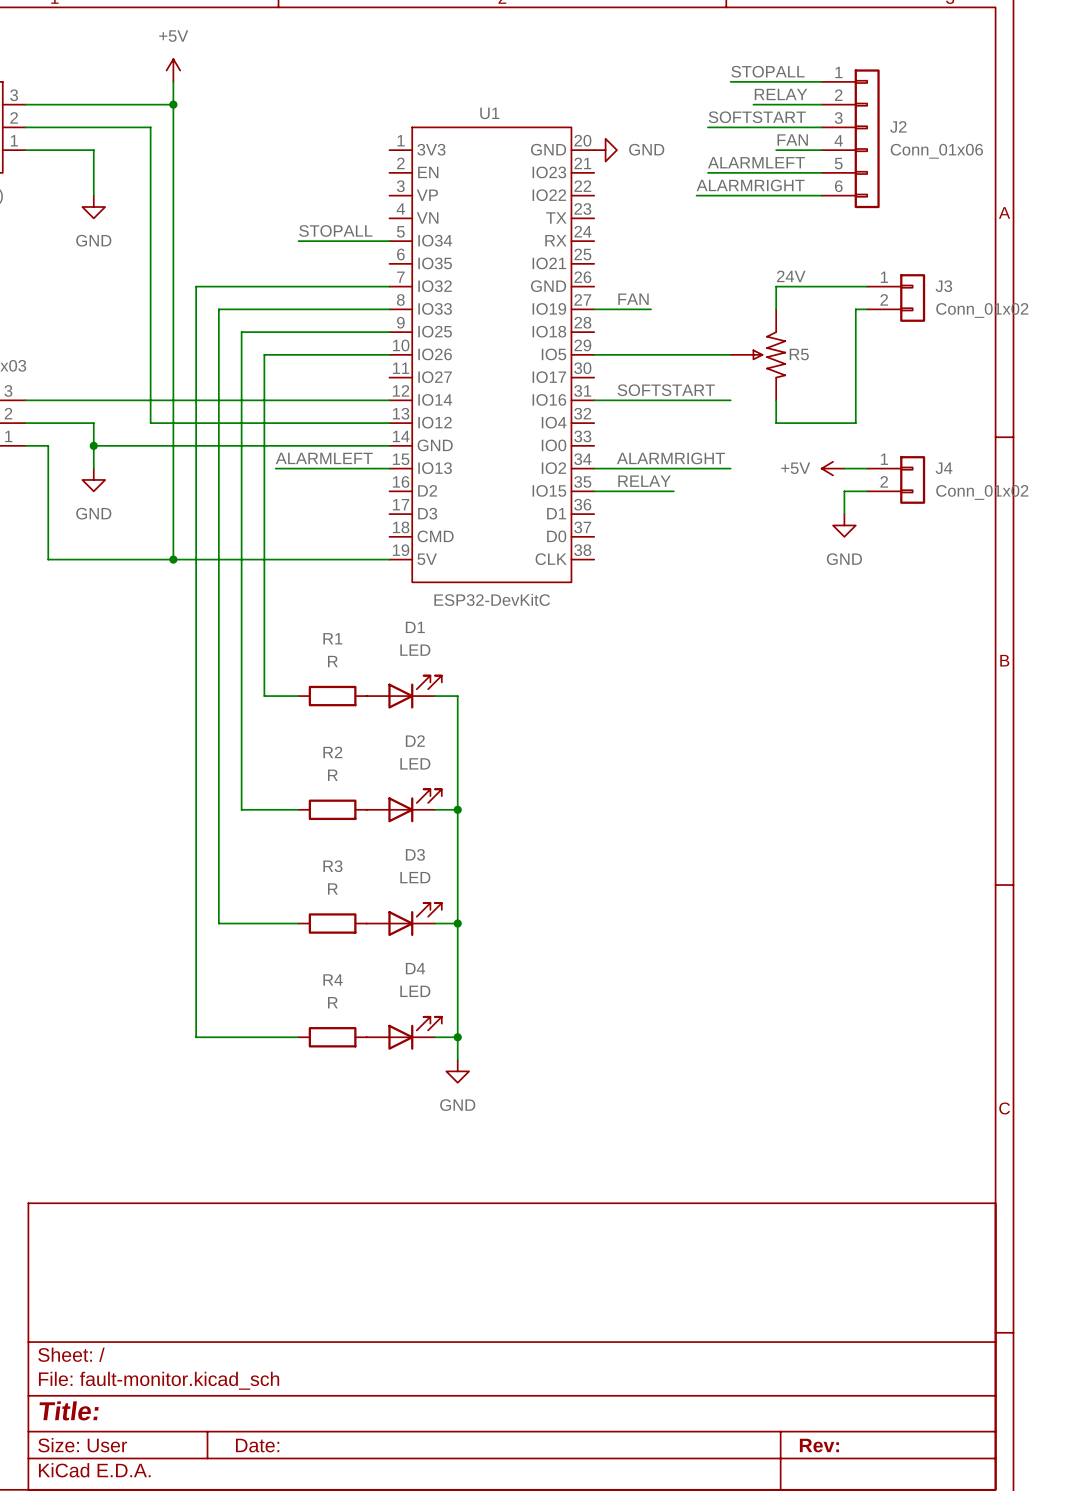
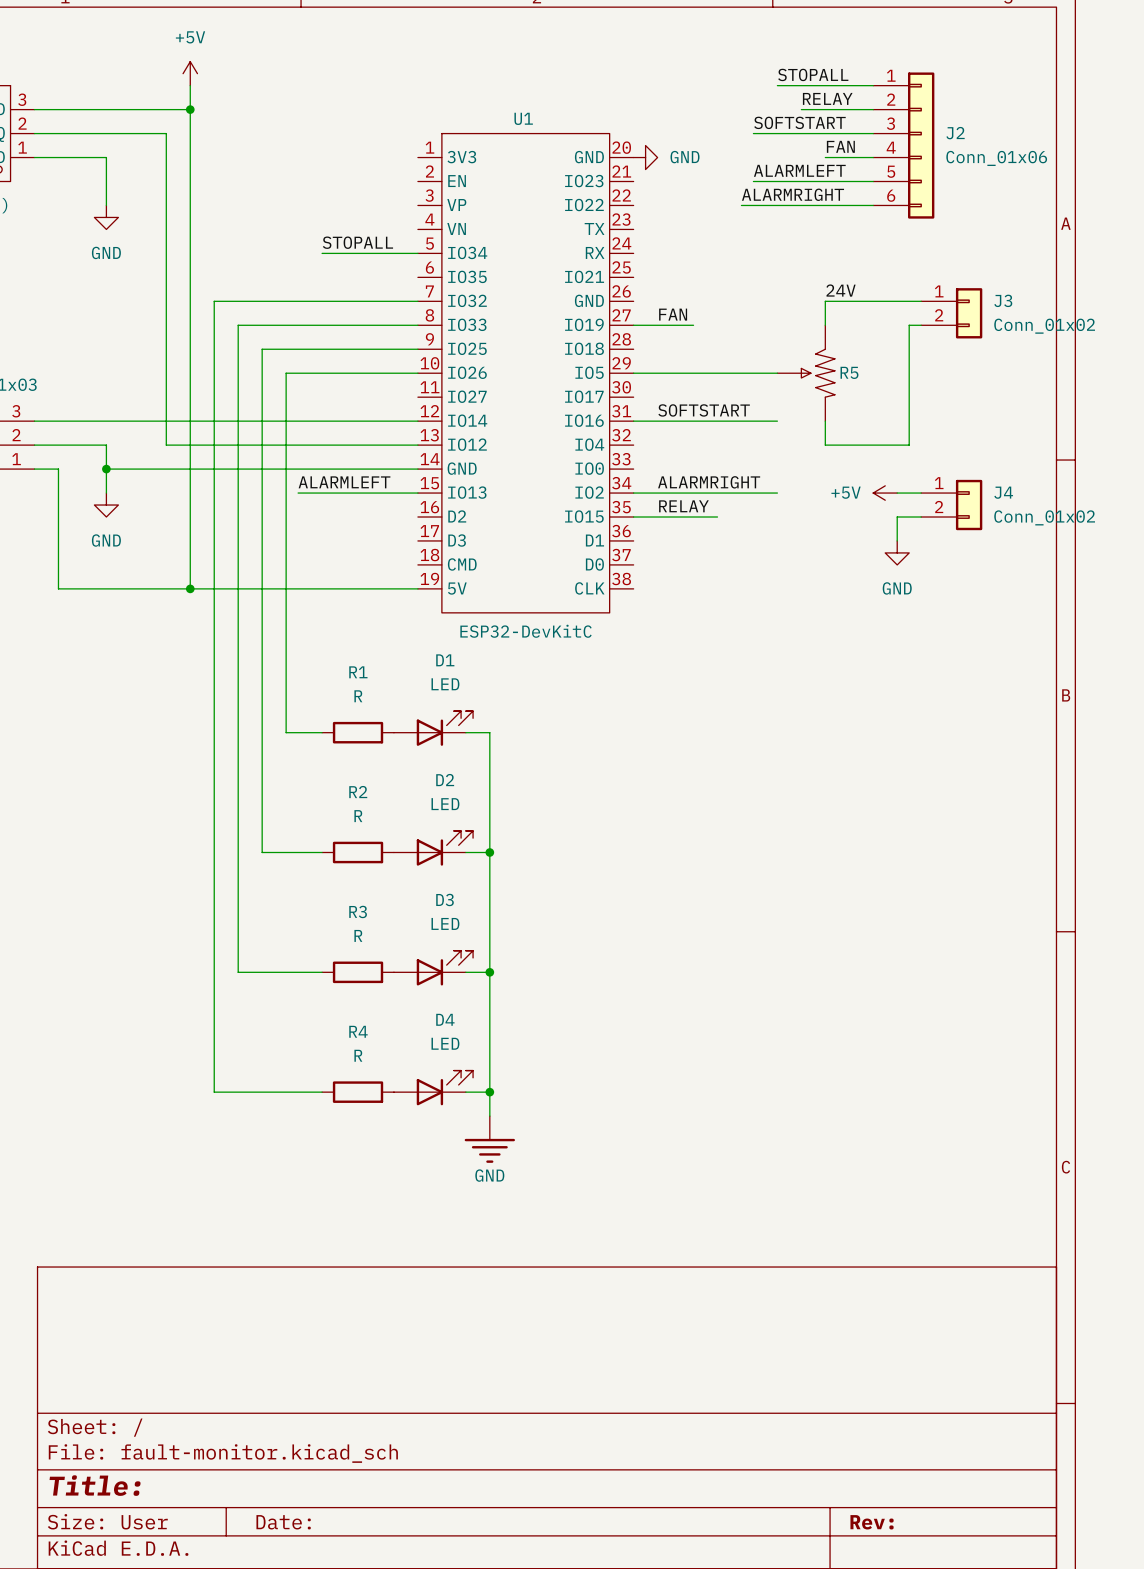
power symbol: GND (457, 1071) -> none
power symbol: none -> GND (489, 1139)

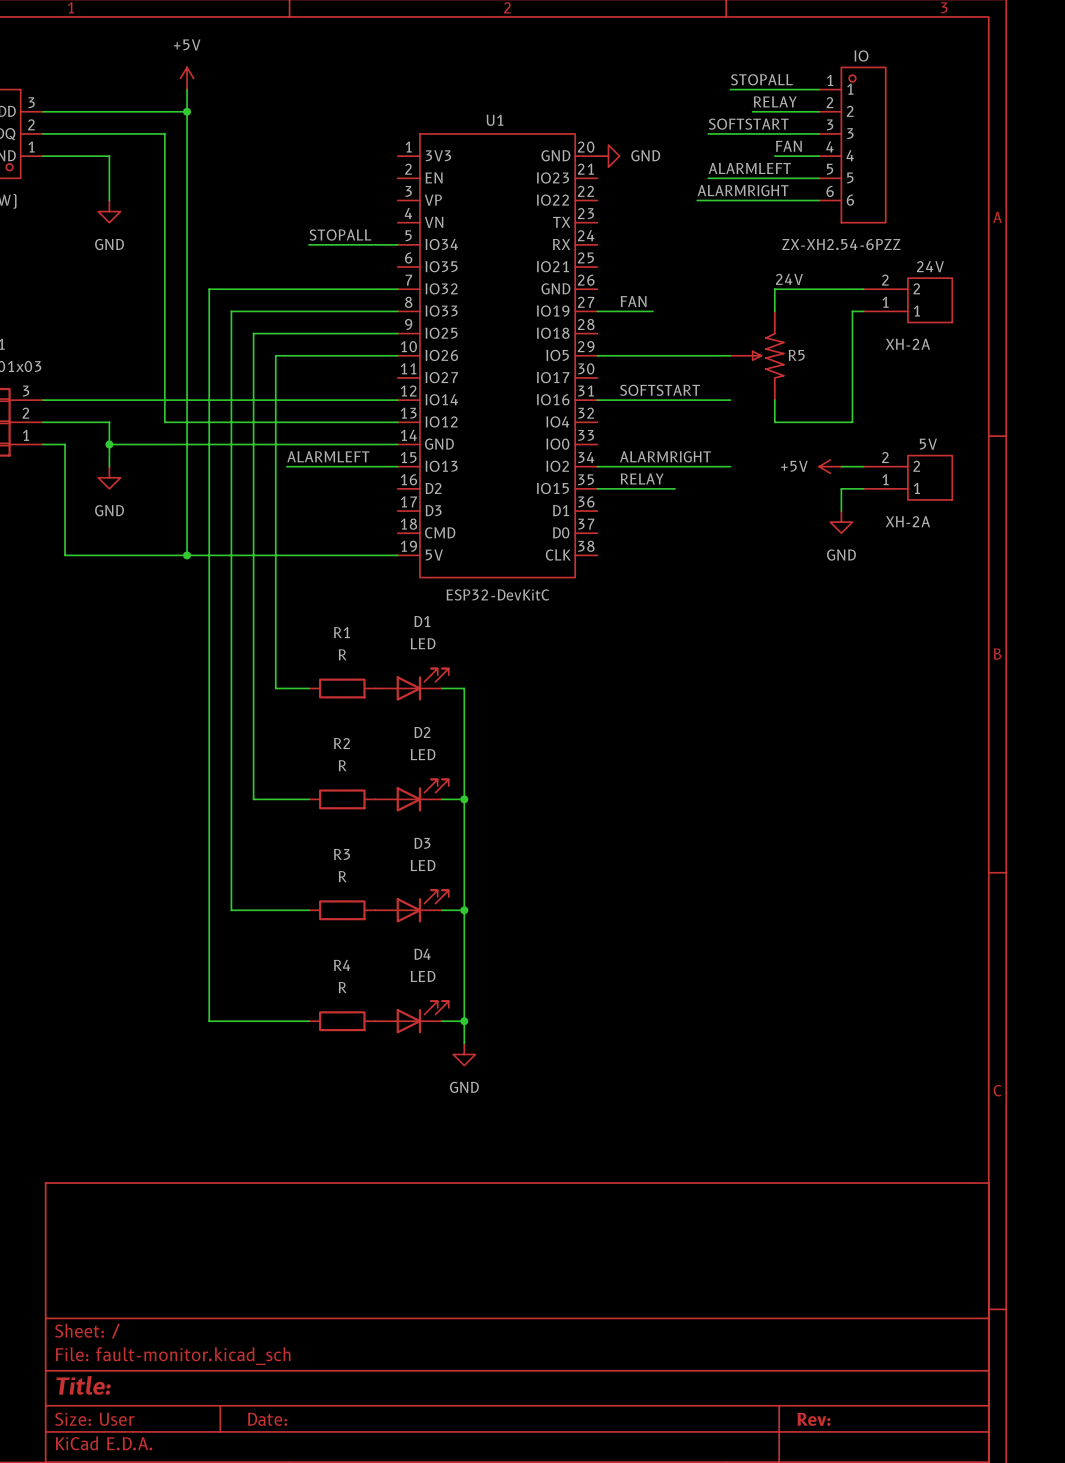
J2: Conn_01x06 (903, 145) -> none
IO: none -> ZX-XH2.54-6PZZ (852, 145)
J3: Conn_01x02 (951, 313) -> none
24V: none -> XH-2A (907, 300)
J4: Conn_01x02 (951, 505) -> none
5V: none -> XH-2A (907, 477)
power symbol: none -> GND (464, 1054)
power symbol: GND (489, 1139) -> none

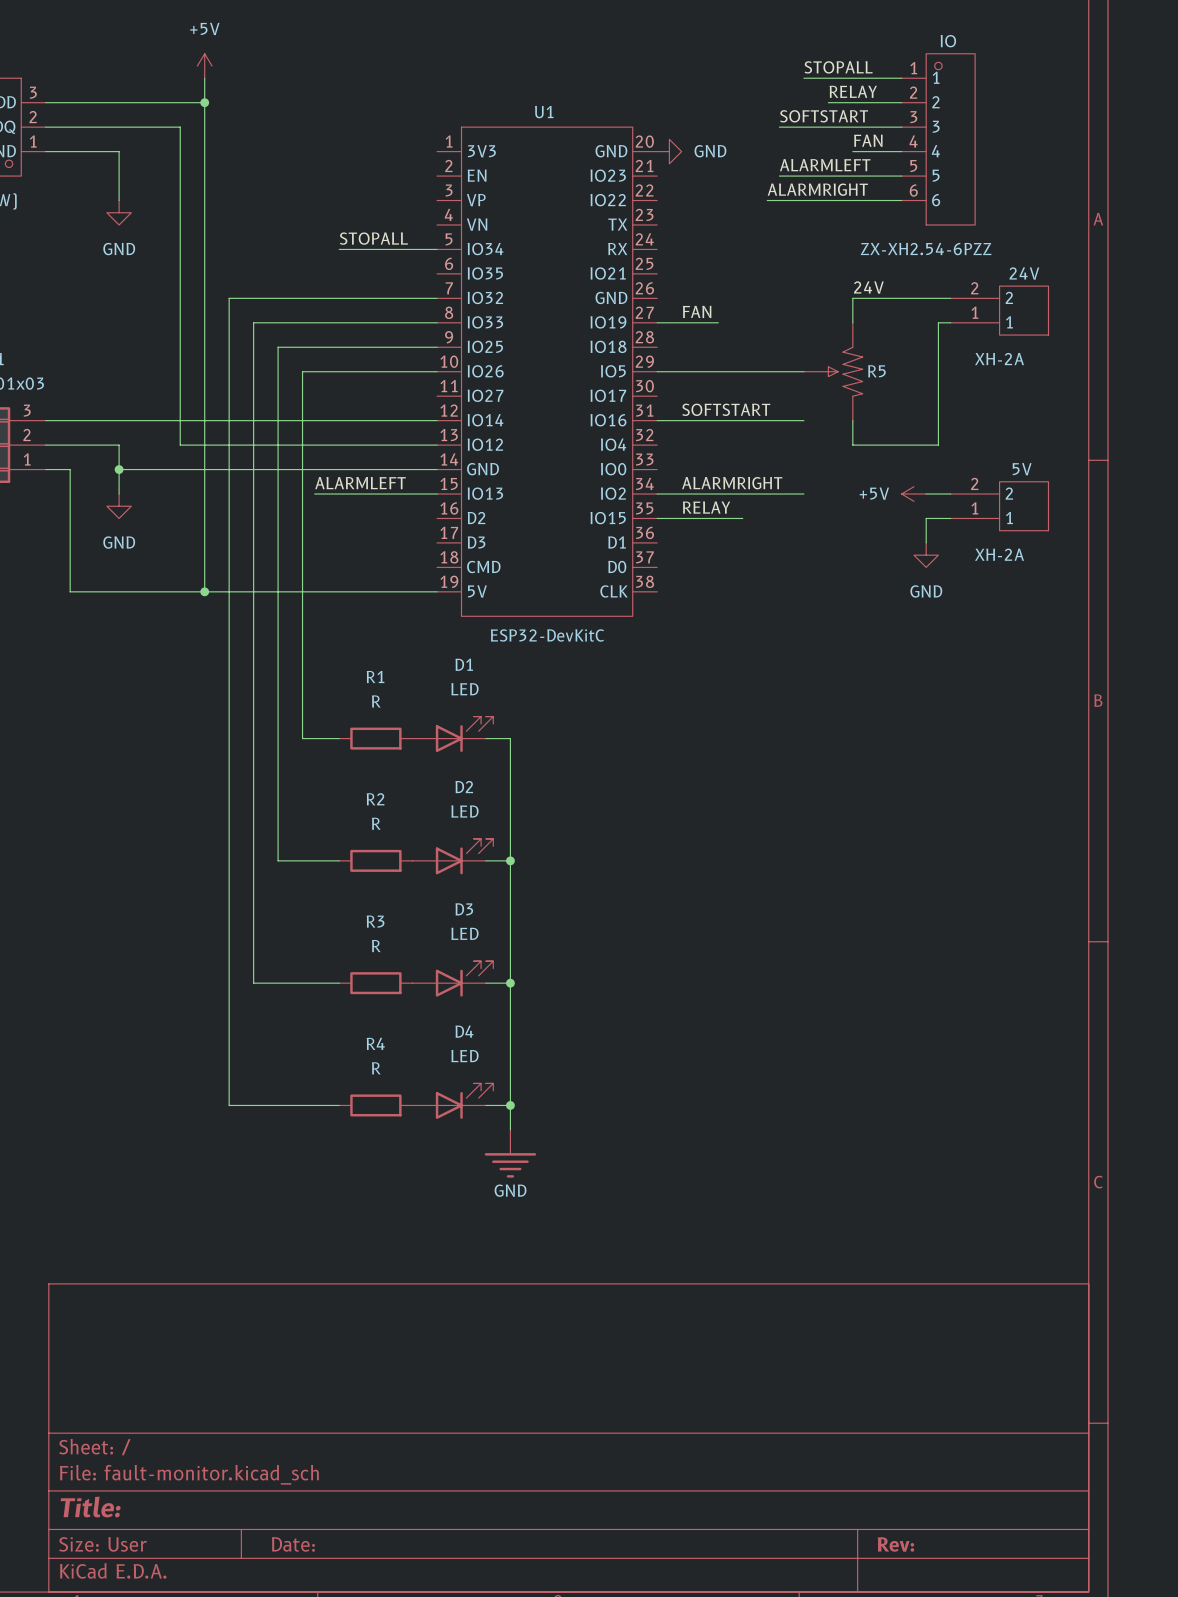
power symbol: GND (464, 1054) -> none
power symbol: none -> GND (510, 1153)

